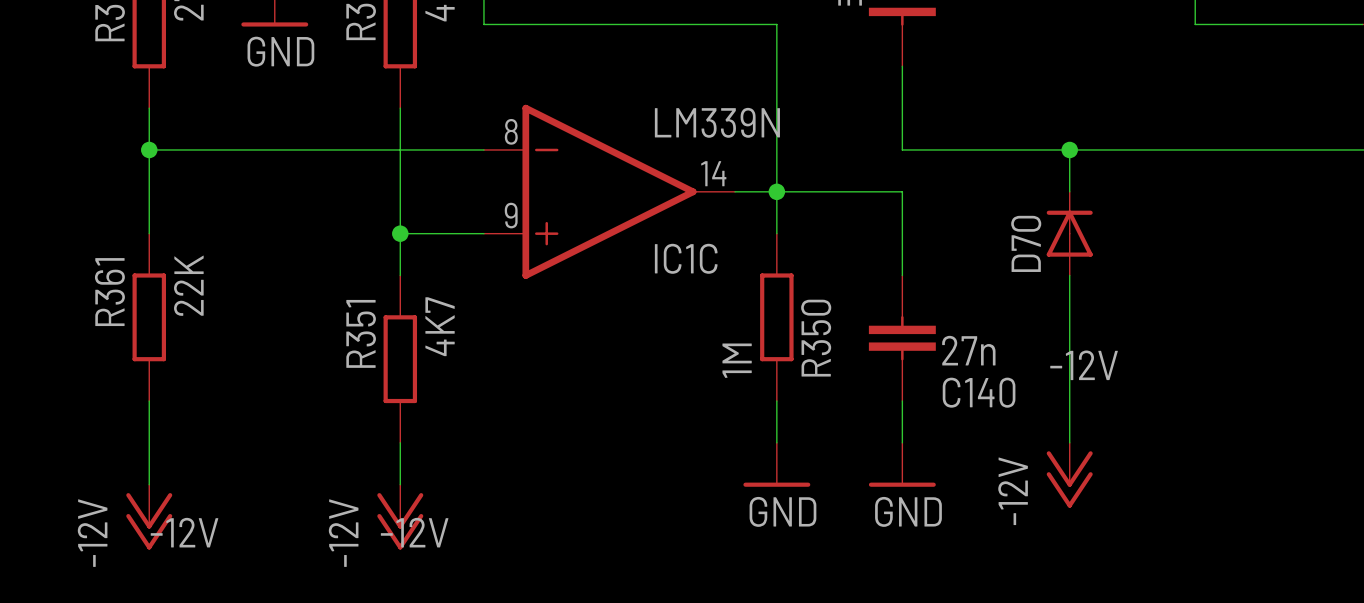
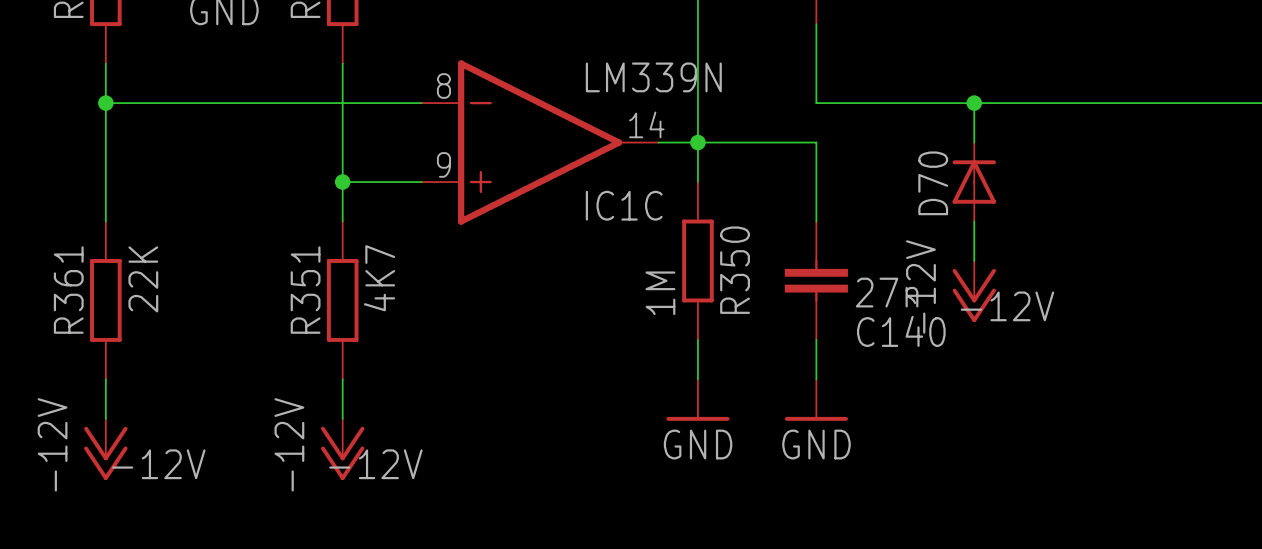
R361 position: (149, 317) -> (105, 300)
wire: (1069, 317) (1069, 442) -> none
power symbol position: -12V (1069, 475) -> -12V (974, 291)

